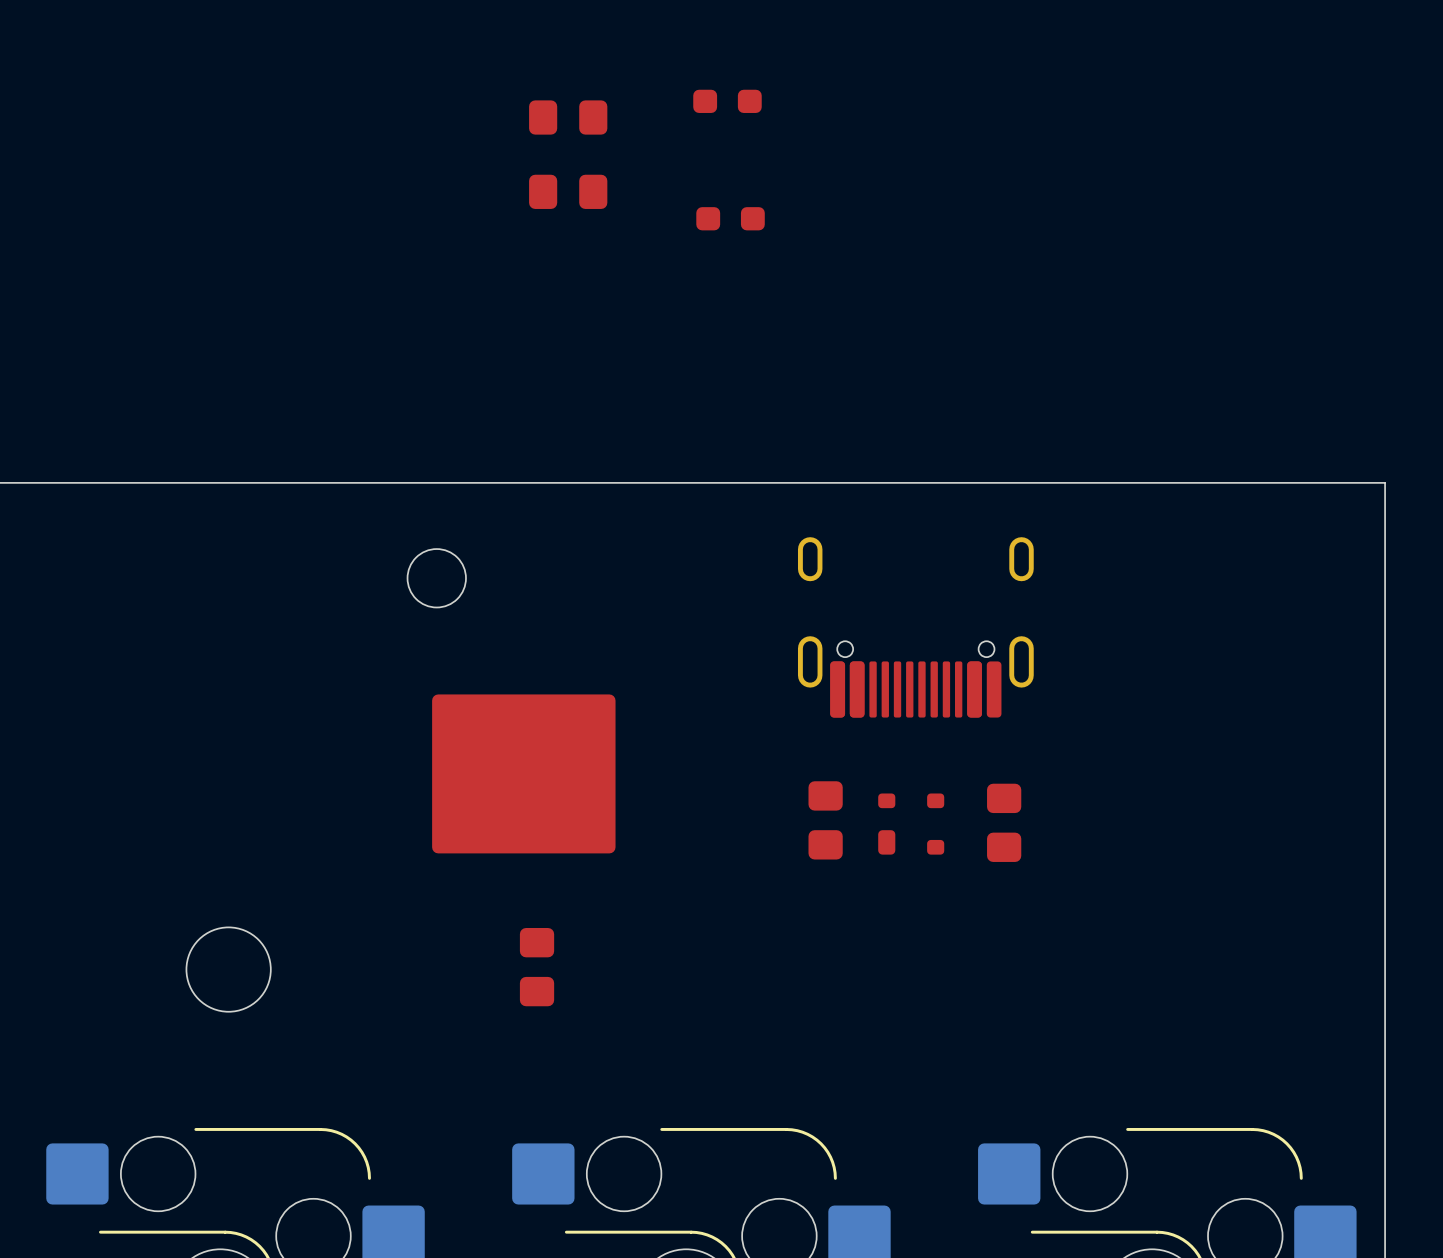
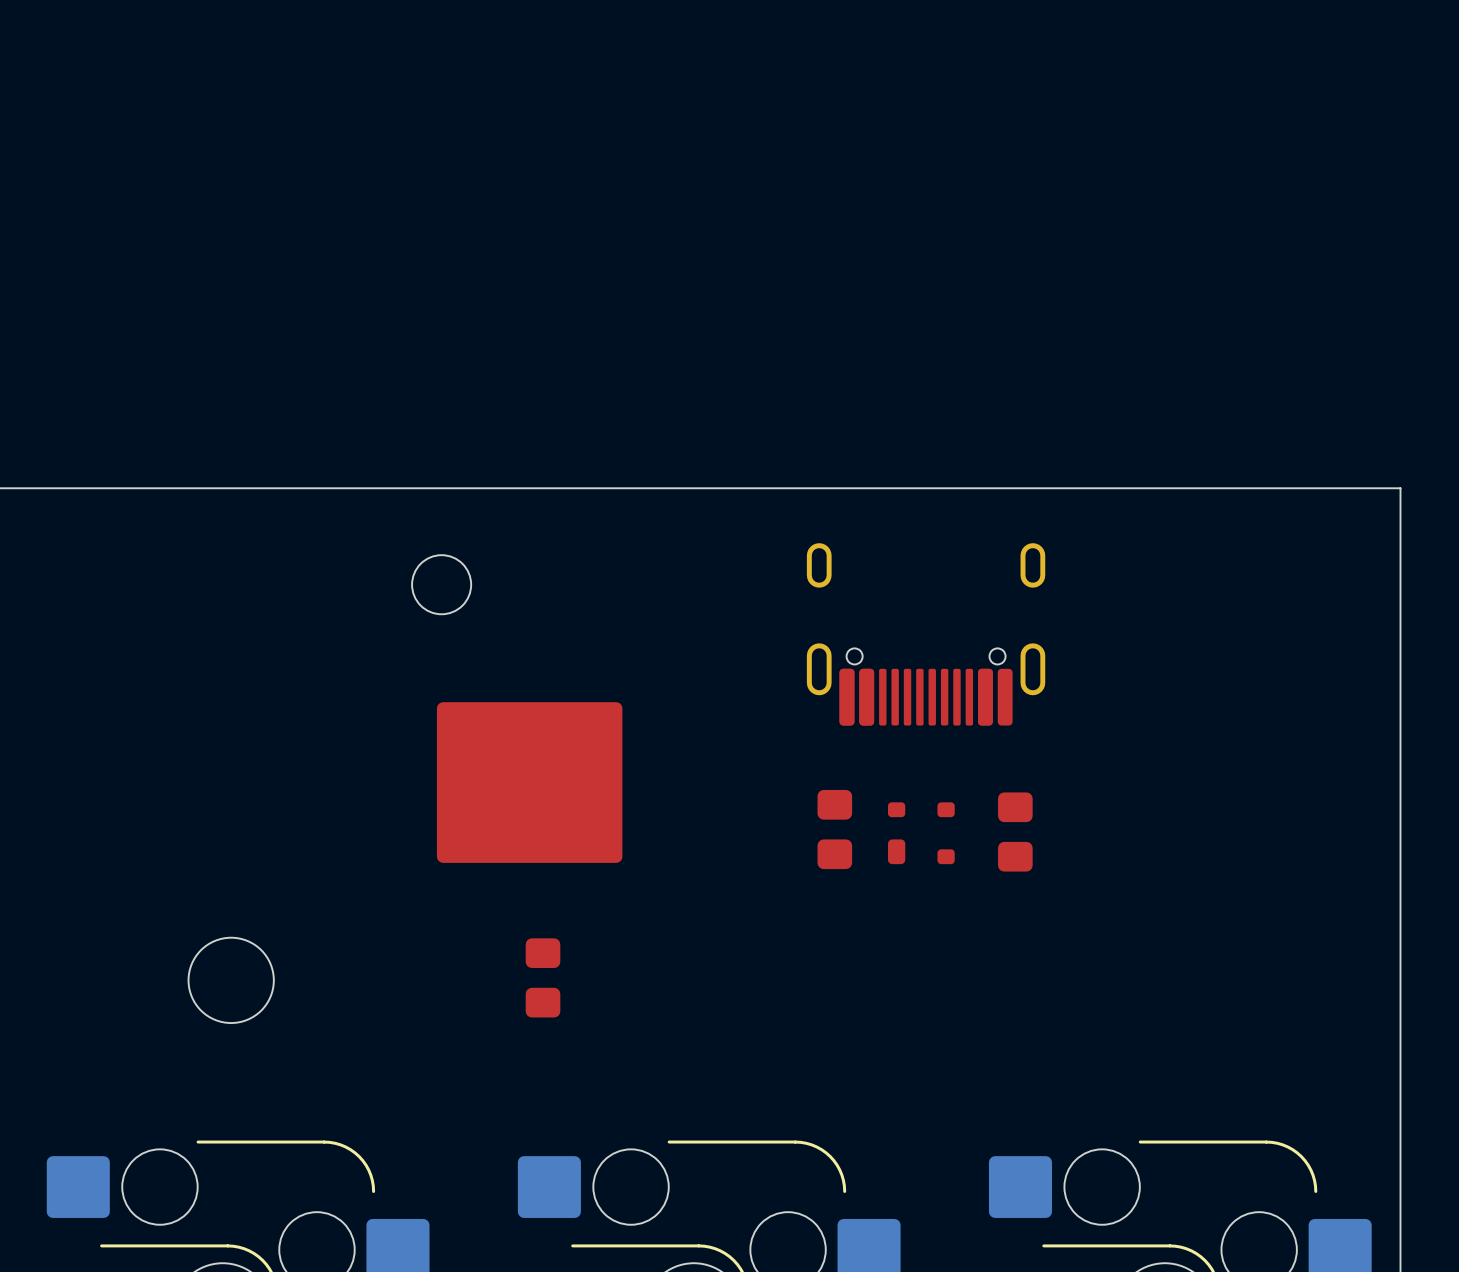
part: (727, 101) -> none
part: (568, 117) -> none
part: (568, 191) -> none
part: (730, 218) -> none

